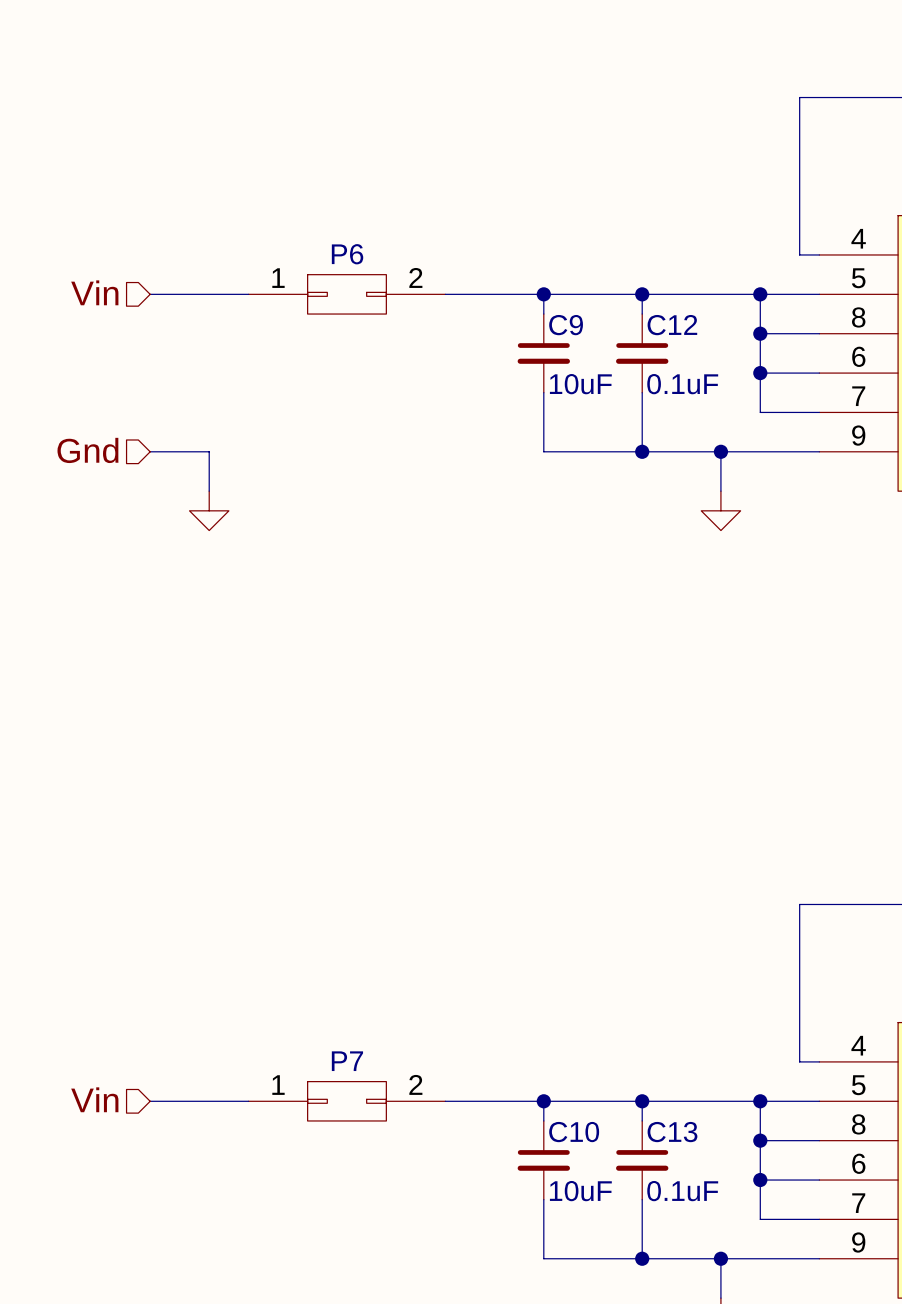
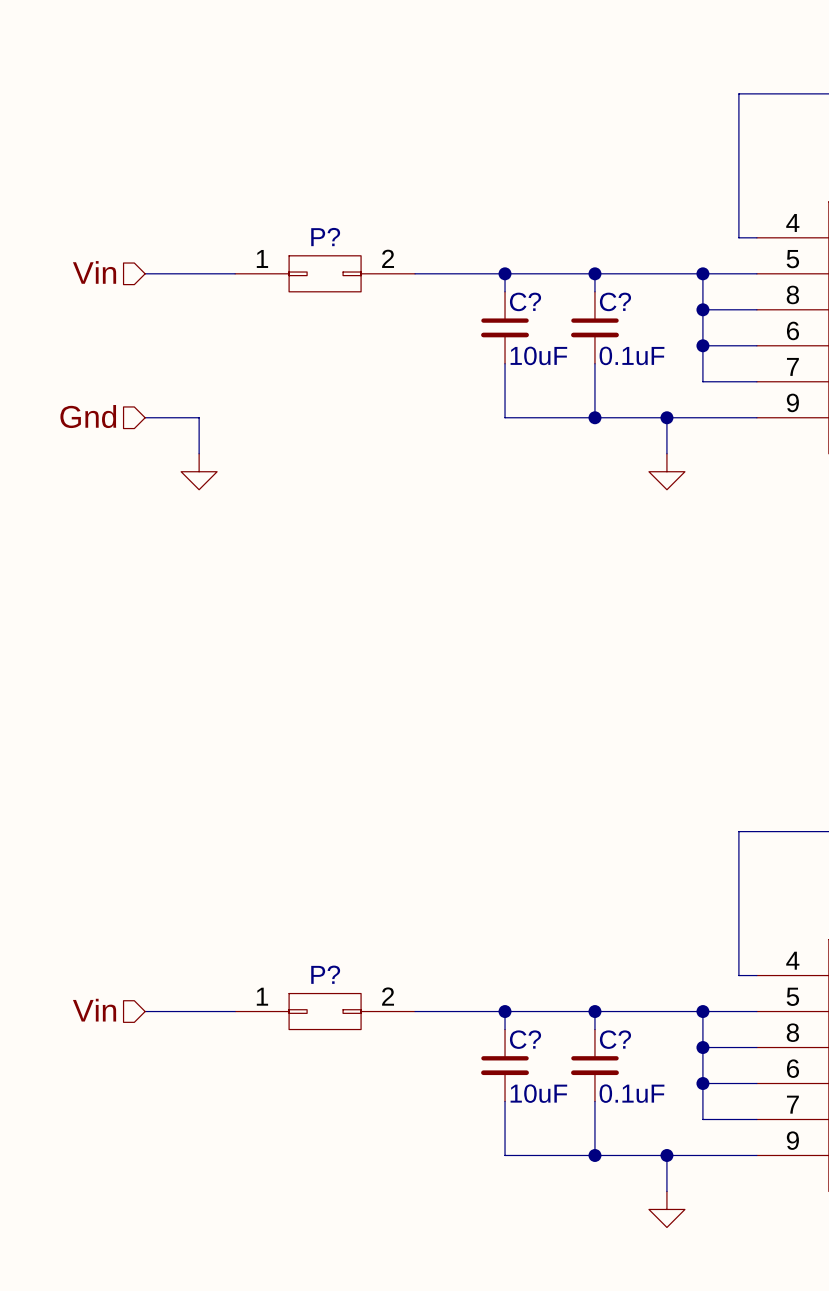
P6 name: P6 (347, 254) -> P? (325, 237)
C9 name: C9 (566, 325) -> C? (525, 301)
C12 name: C12 (672, 325) -> C? (615, 301)
P7 name: P7 (347, 1061) -> P? (325, 974)
C10 name: C10 (574, 1132) -> C? (525, 1039)
C13 name: C13 (672, 1132) -> C? (615, 1039)

